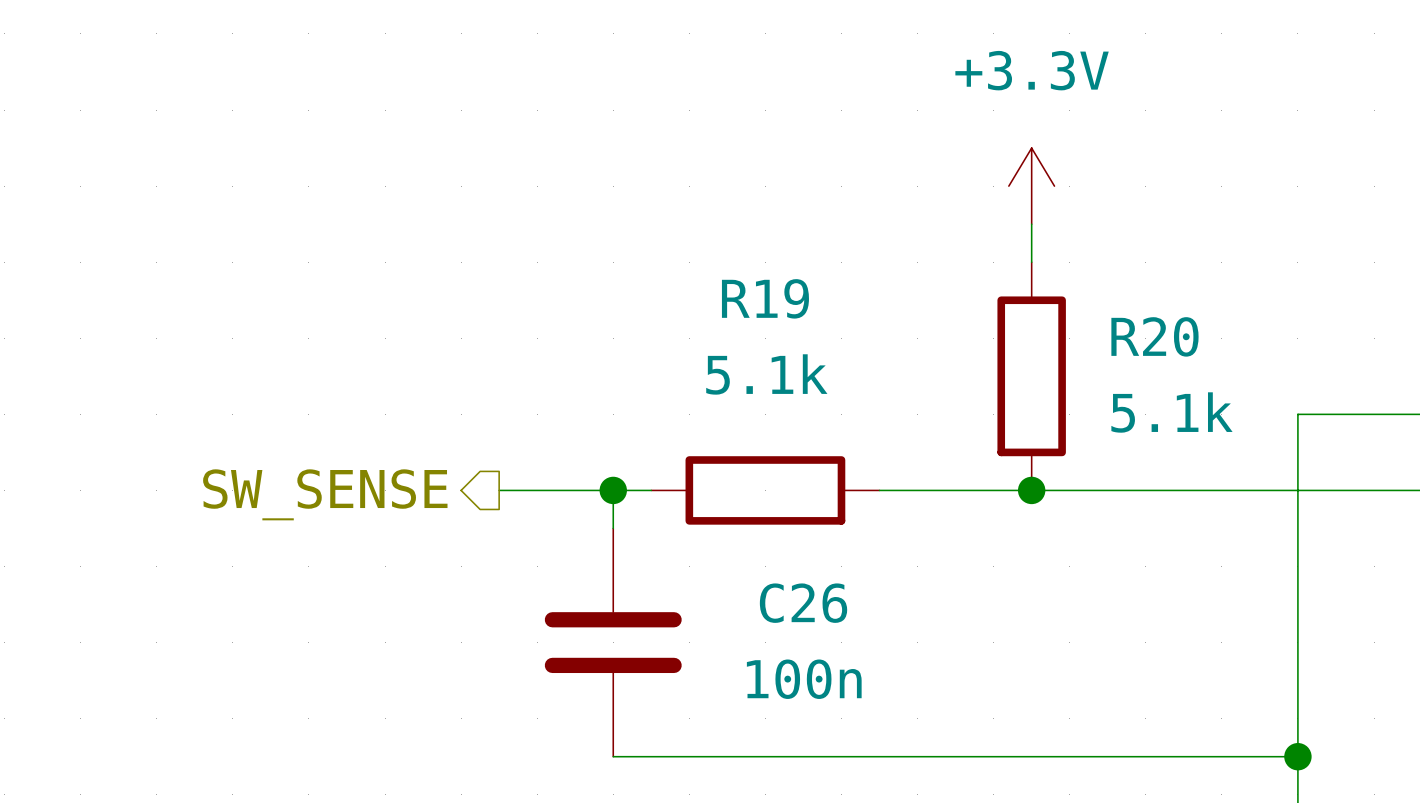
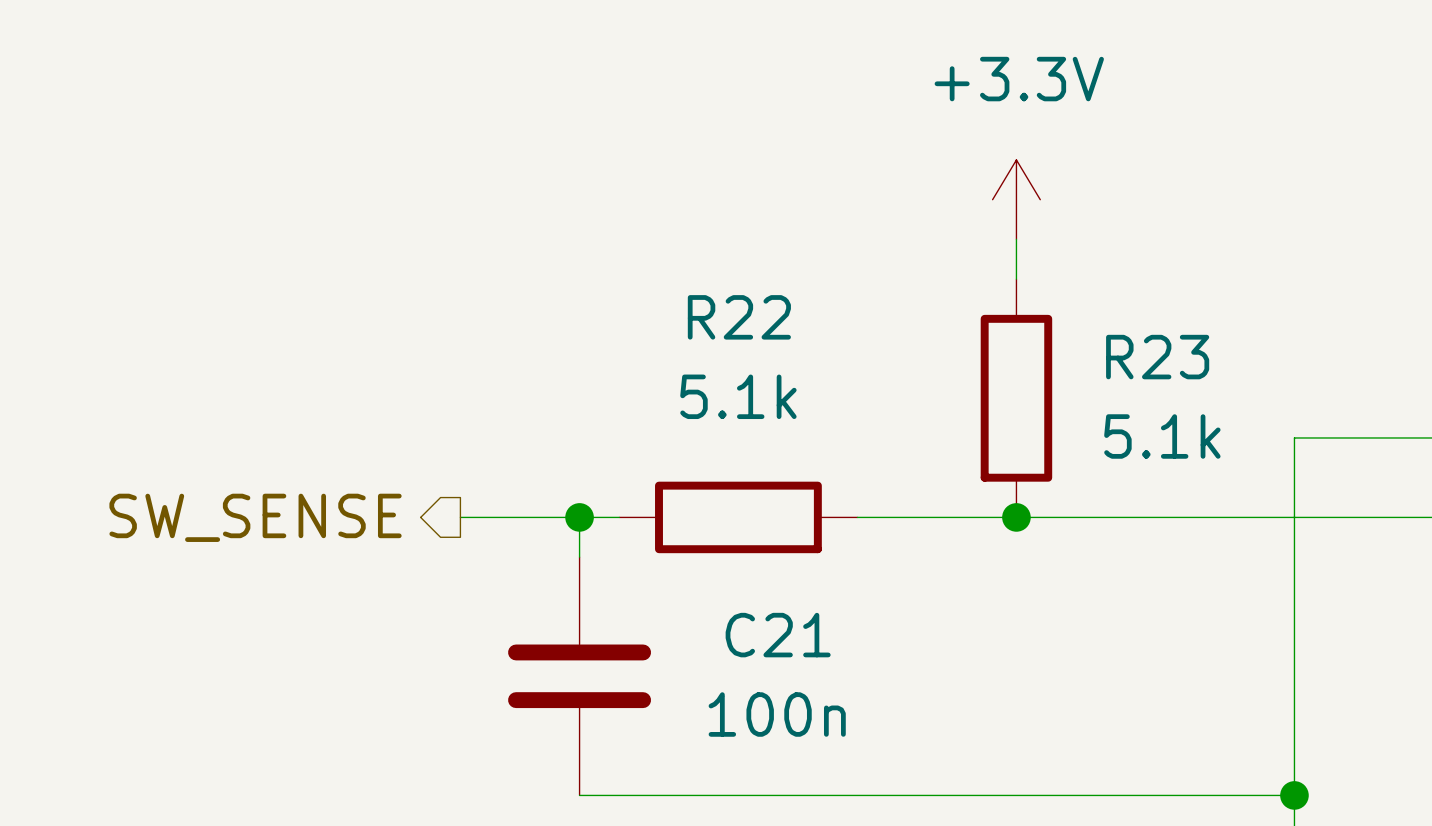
R19 name: R19 (765, 298) -> R22 (739, 317)
R20 name: R20 (1154, 336) -> R23 (1157, 357)
C26 name: C26 (803, 603) -> C21 (778, 635)

